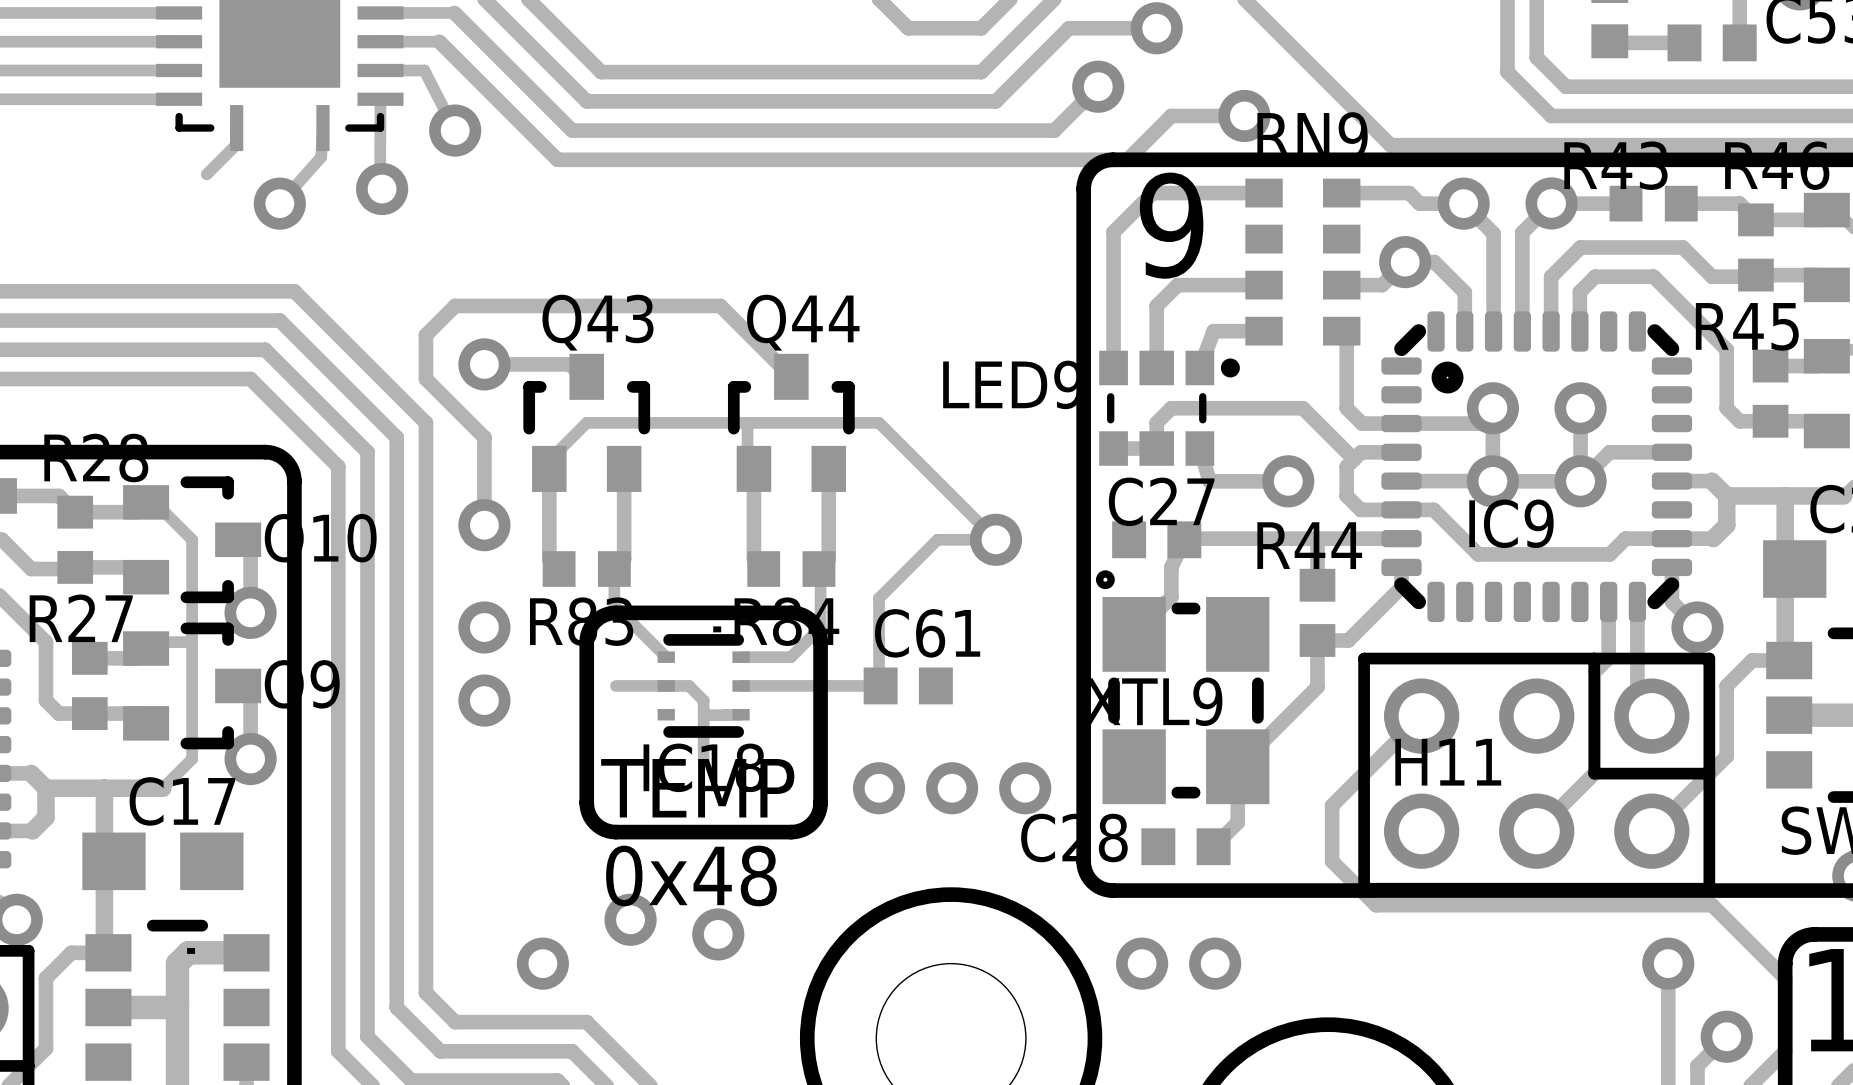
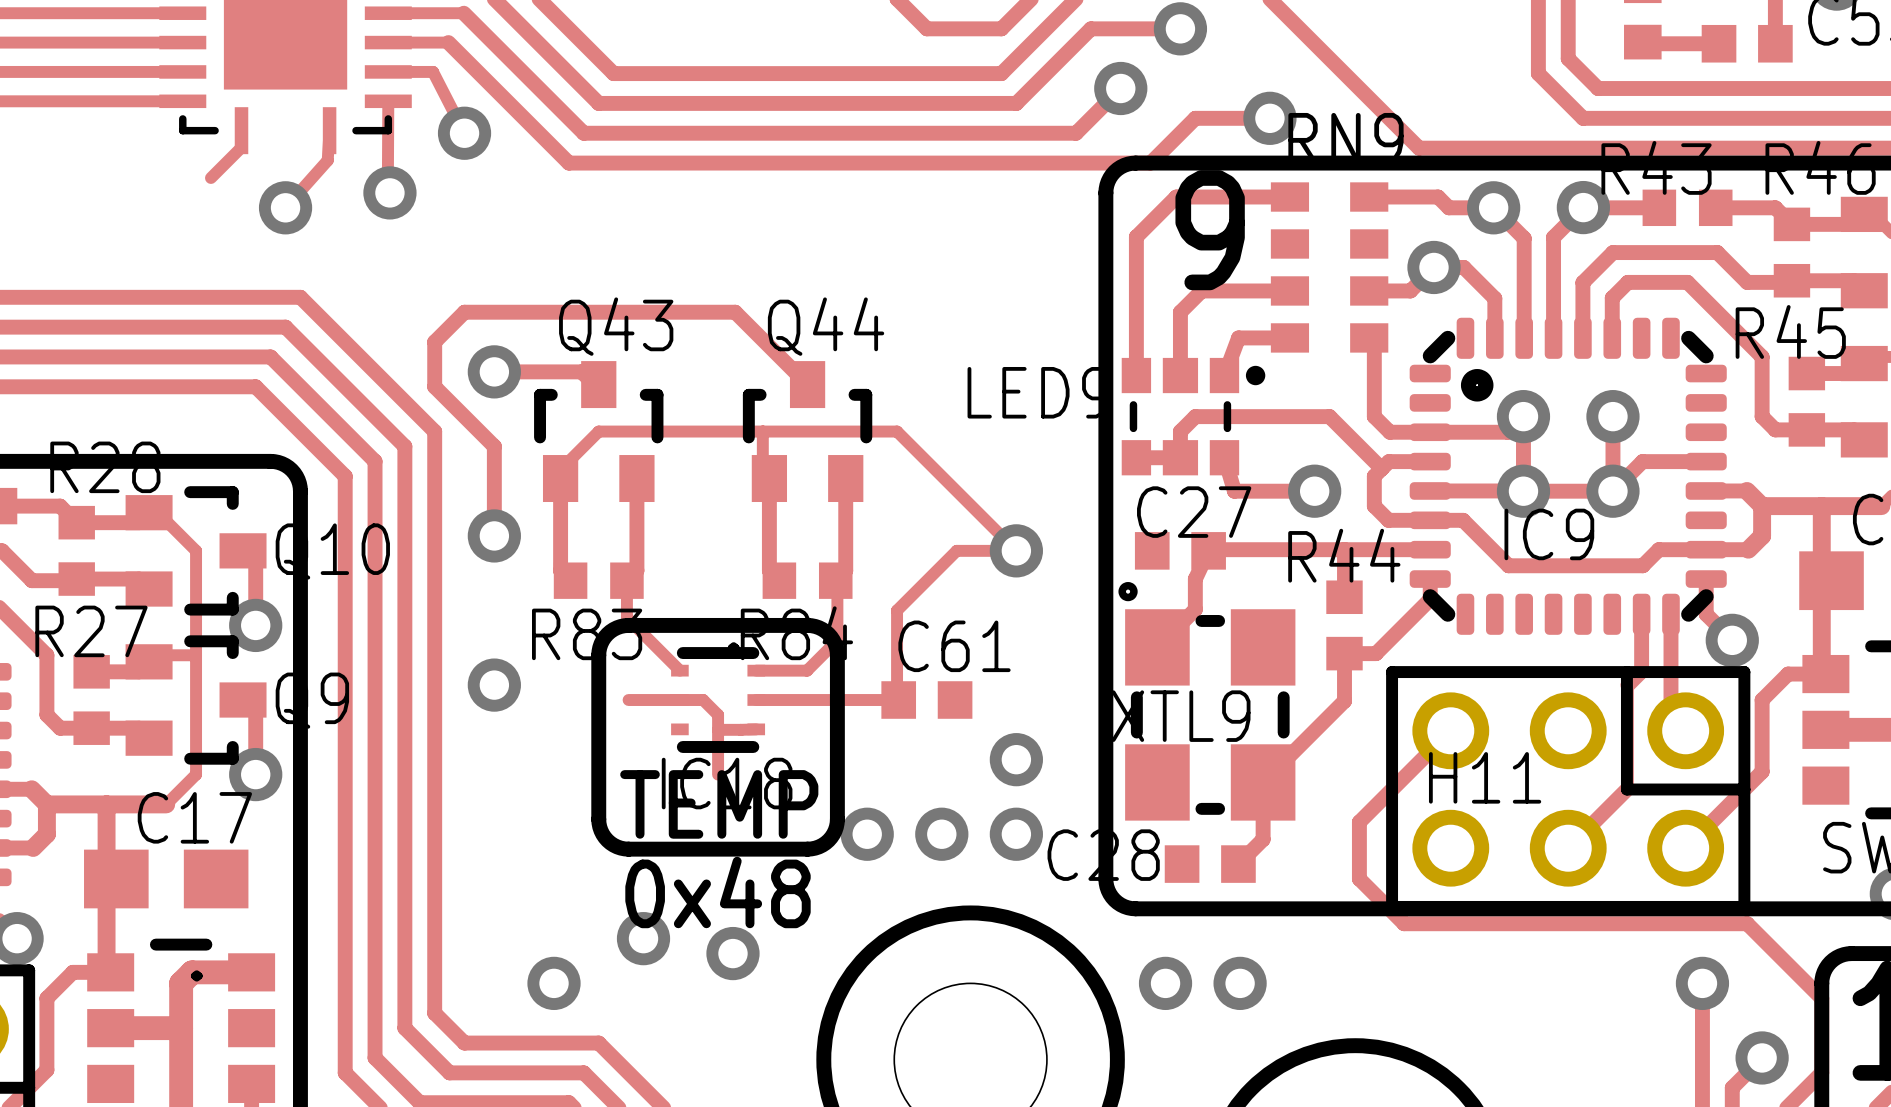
via: (484, 627) -> none
via: none -> (494, 685)
via: (484, 700) -> none
via: none -> (1016, 759)
via: (879, 788) -> none
via: (952, 788) -> none
via: (1025, 788) -> none
via: none -> (867, 834)
via: none -> (941, 834)
via: none -> (1016, 834)

